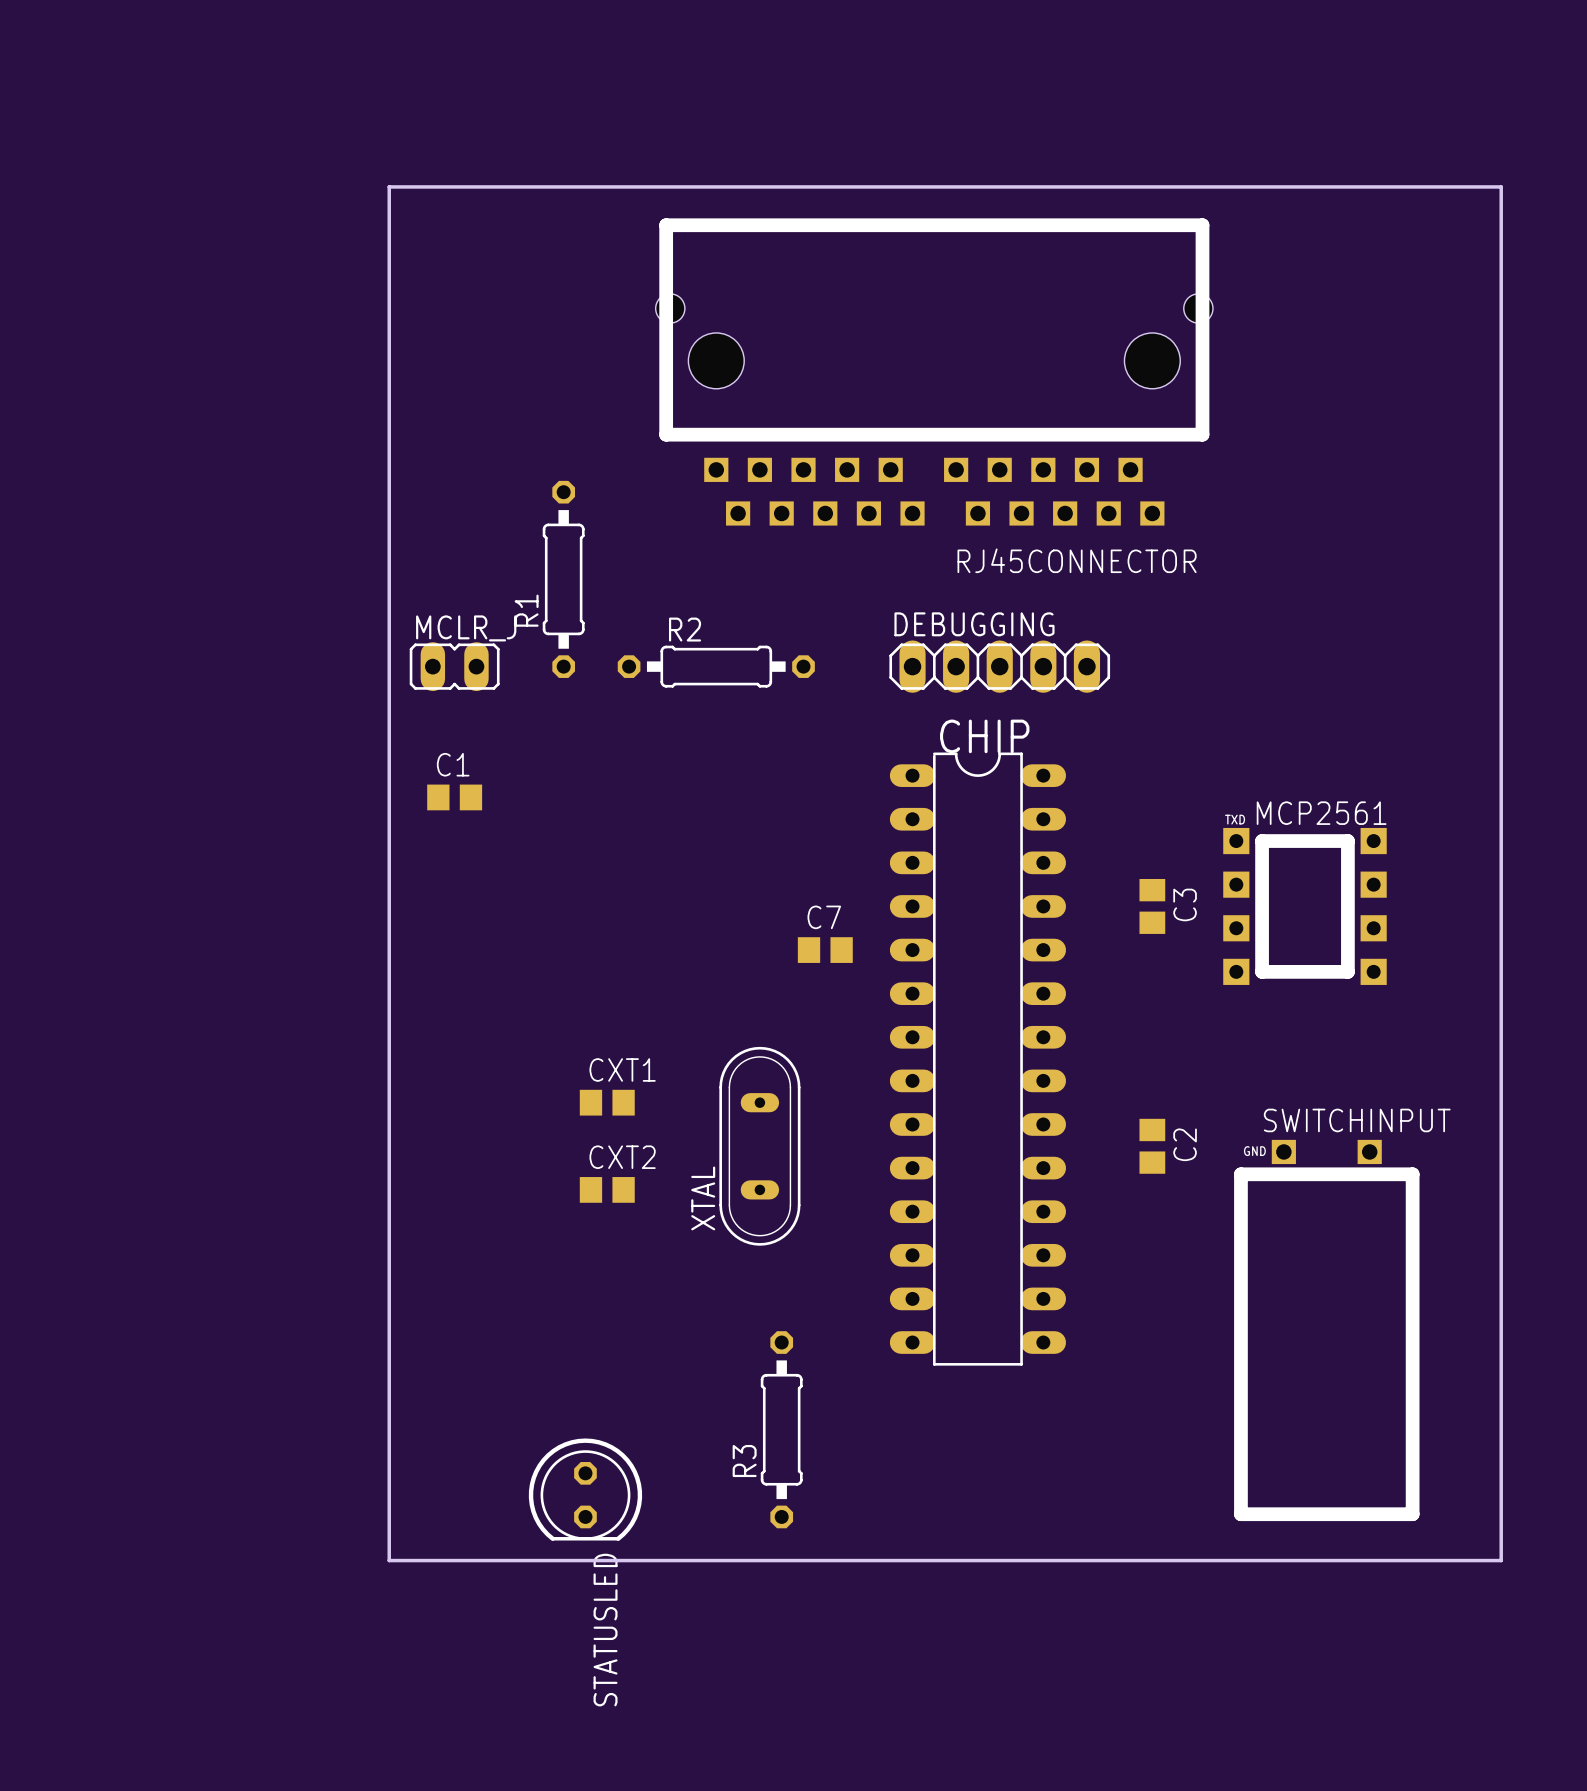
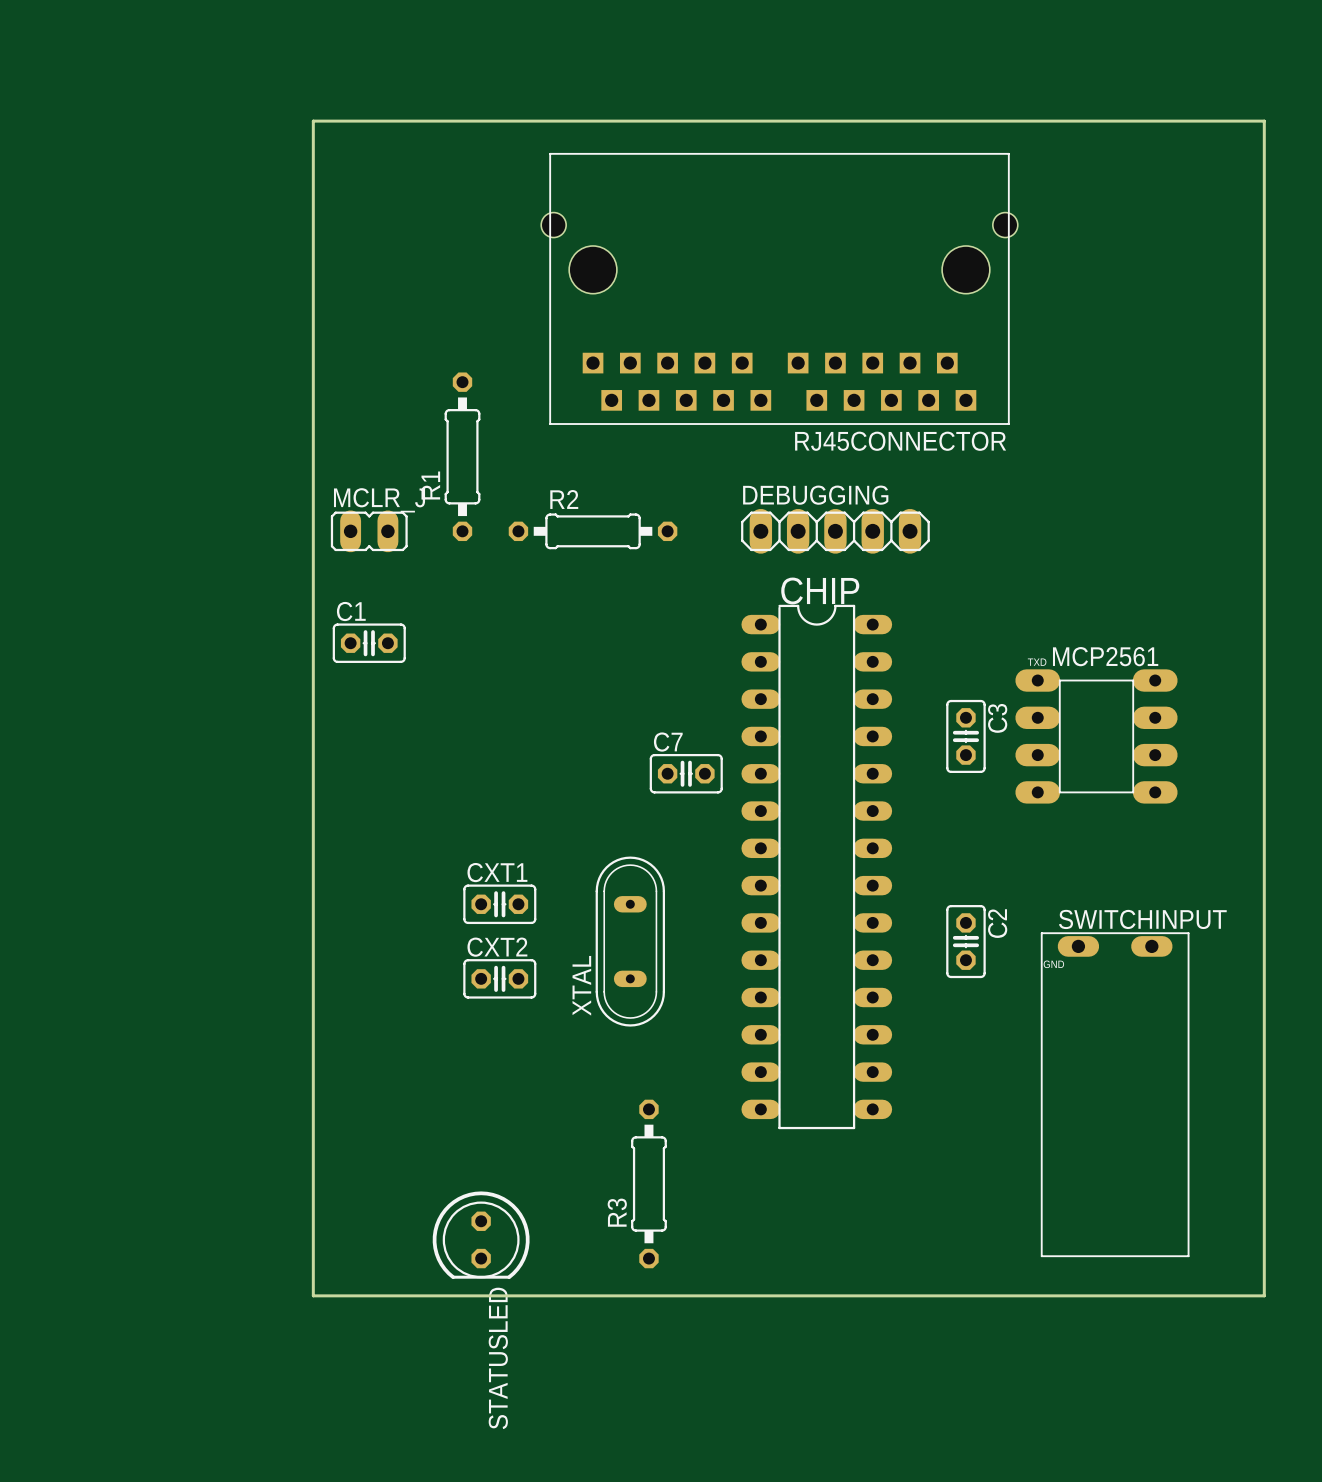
RJ45CONNECTOR footprint: [655, 218, 1213, 526] -> [541, 152, 1018, 425]
C1 footprint: [427, 784, 483, 811] -> [332, 623, 406, 663]
MCP2561 footprint: [1223, 827, 1387, 985] -> [1015, 669, 1178, 804]
C3 footprint: [1139, 878, 1166, 934] -> [946, 699, 986, 774]
C7 footprint: [797, 937, 853, 963] -> [649, 753, 723, 794]
CXT1 footprint: [579, 1089, 635, 1116] -> [463, 884, 537, 925]
C2 footprint: [1139, 1118, 1166, 1174] -> [946, 905, 986, 979]
SWITCHINPUT footprint: [1234, 1139, 1420, 1522] -> [1040, 932, 1190, 1258]
CXT2 footprint: [579, 1177, 635, 1203] -> [463, 959, 537, 999]

